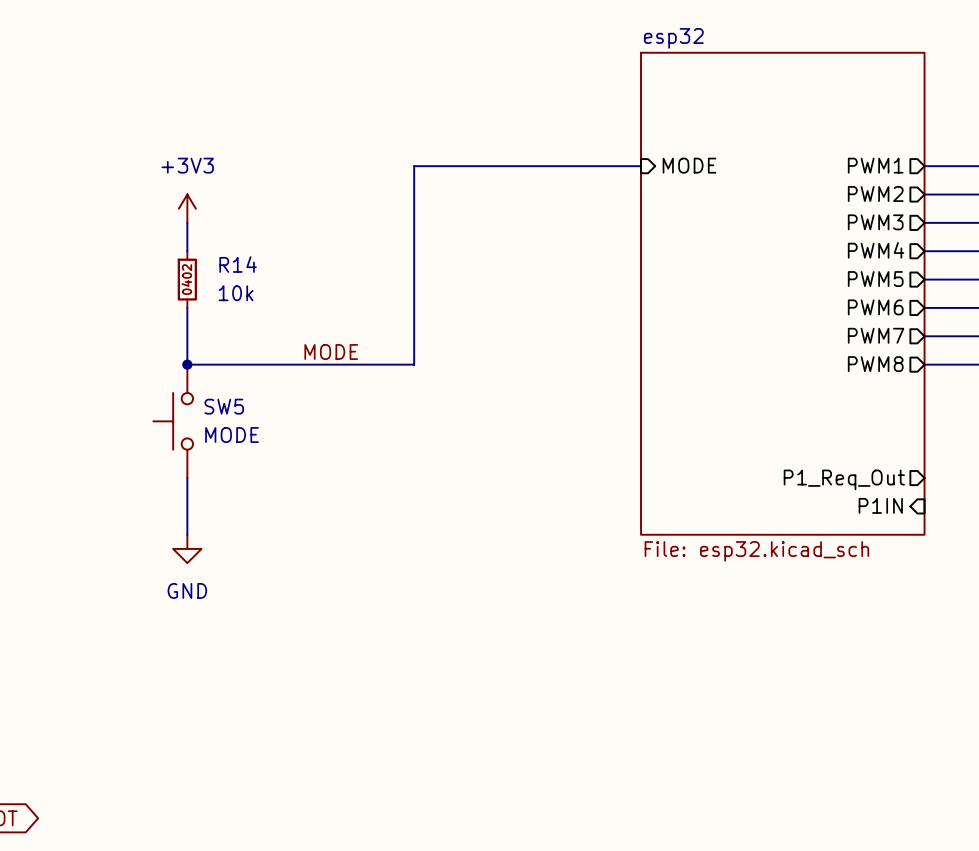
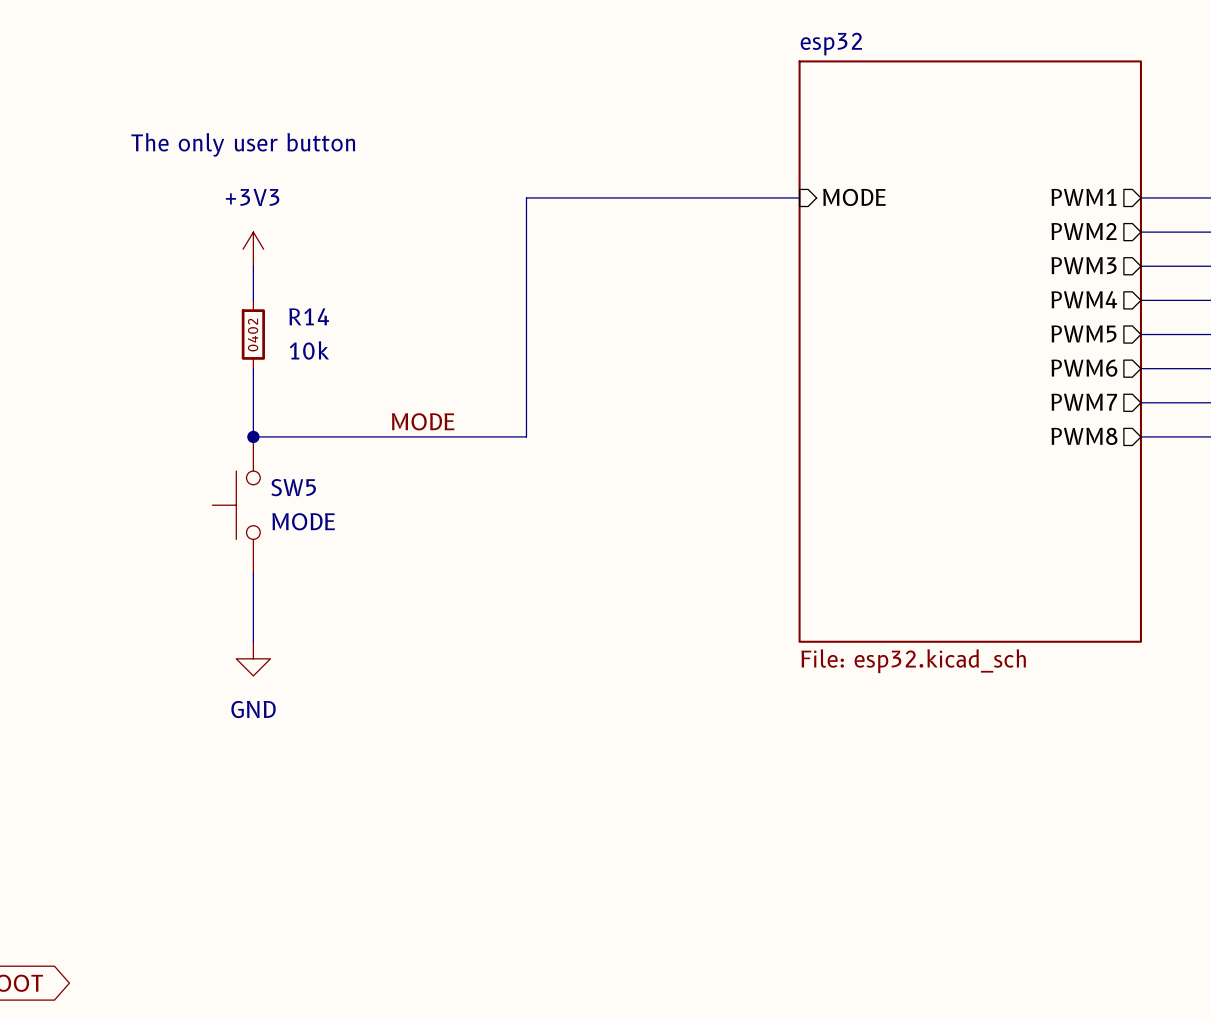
text: none -> The only user button (243, 144)
sheet pin: P1_Req_Out (844, 479) -> none
sheet pin: P1IN (880, 505) -> none

